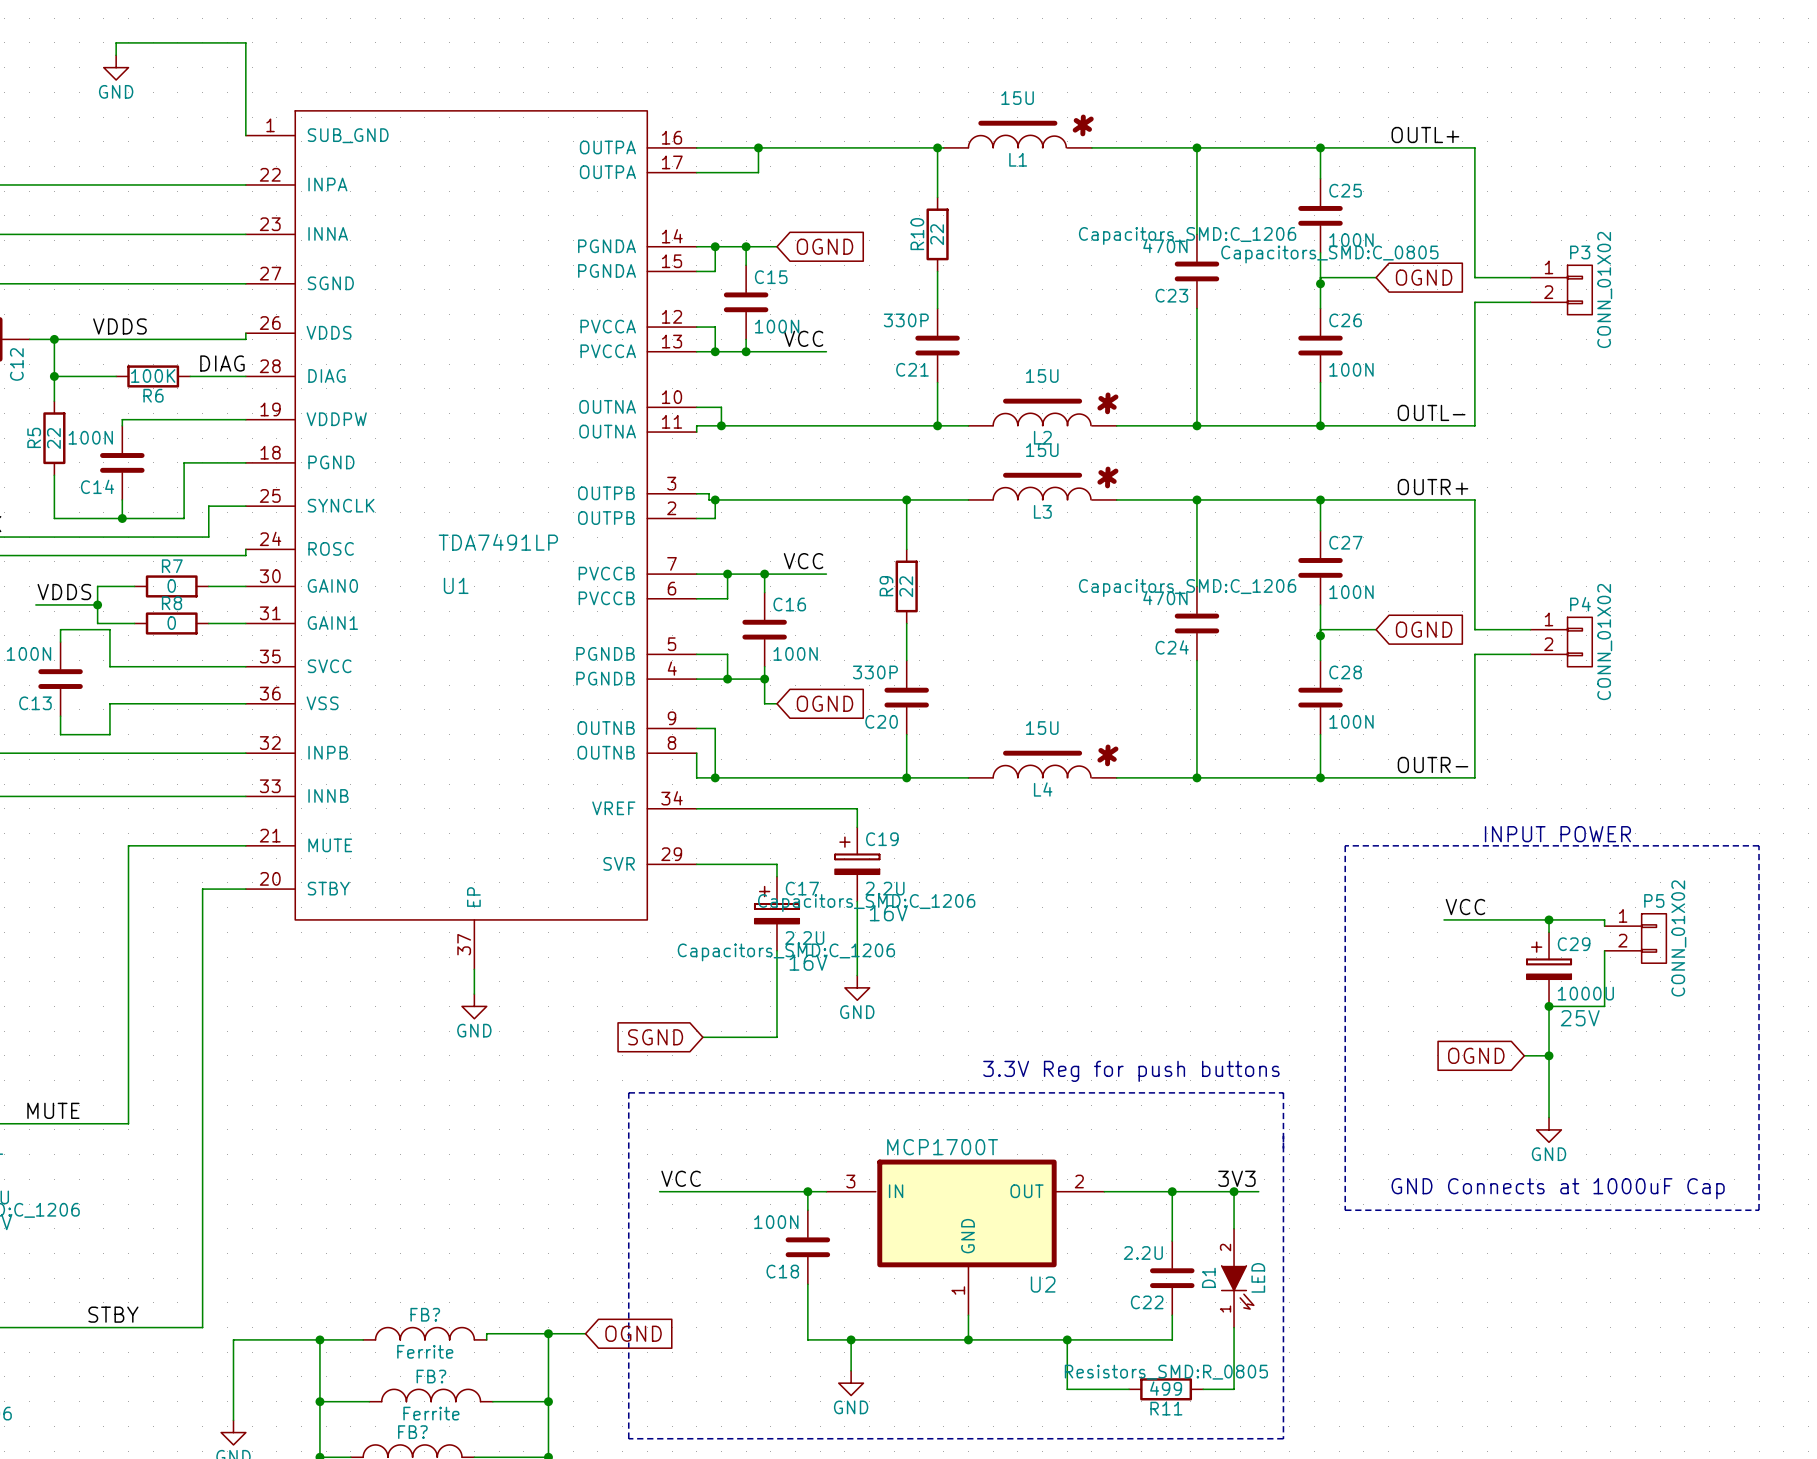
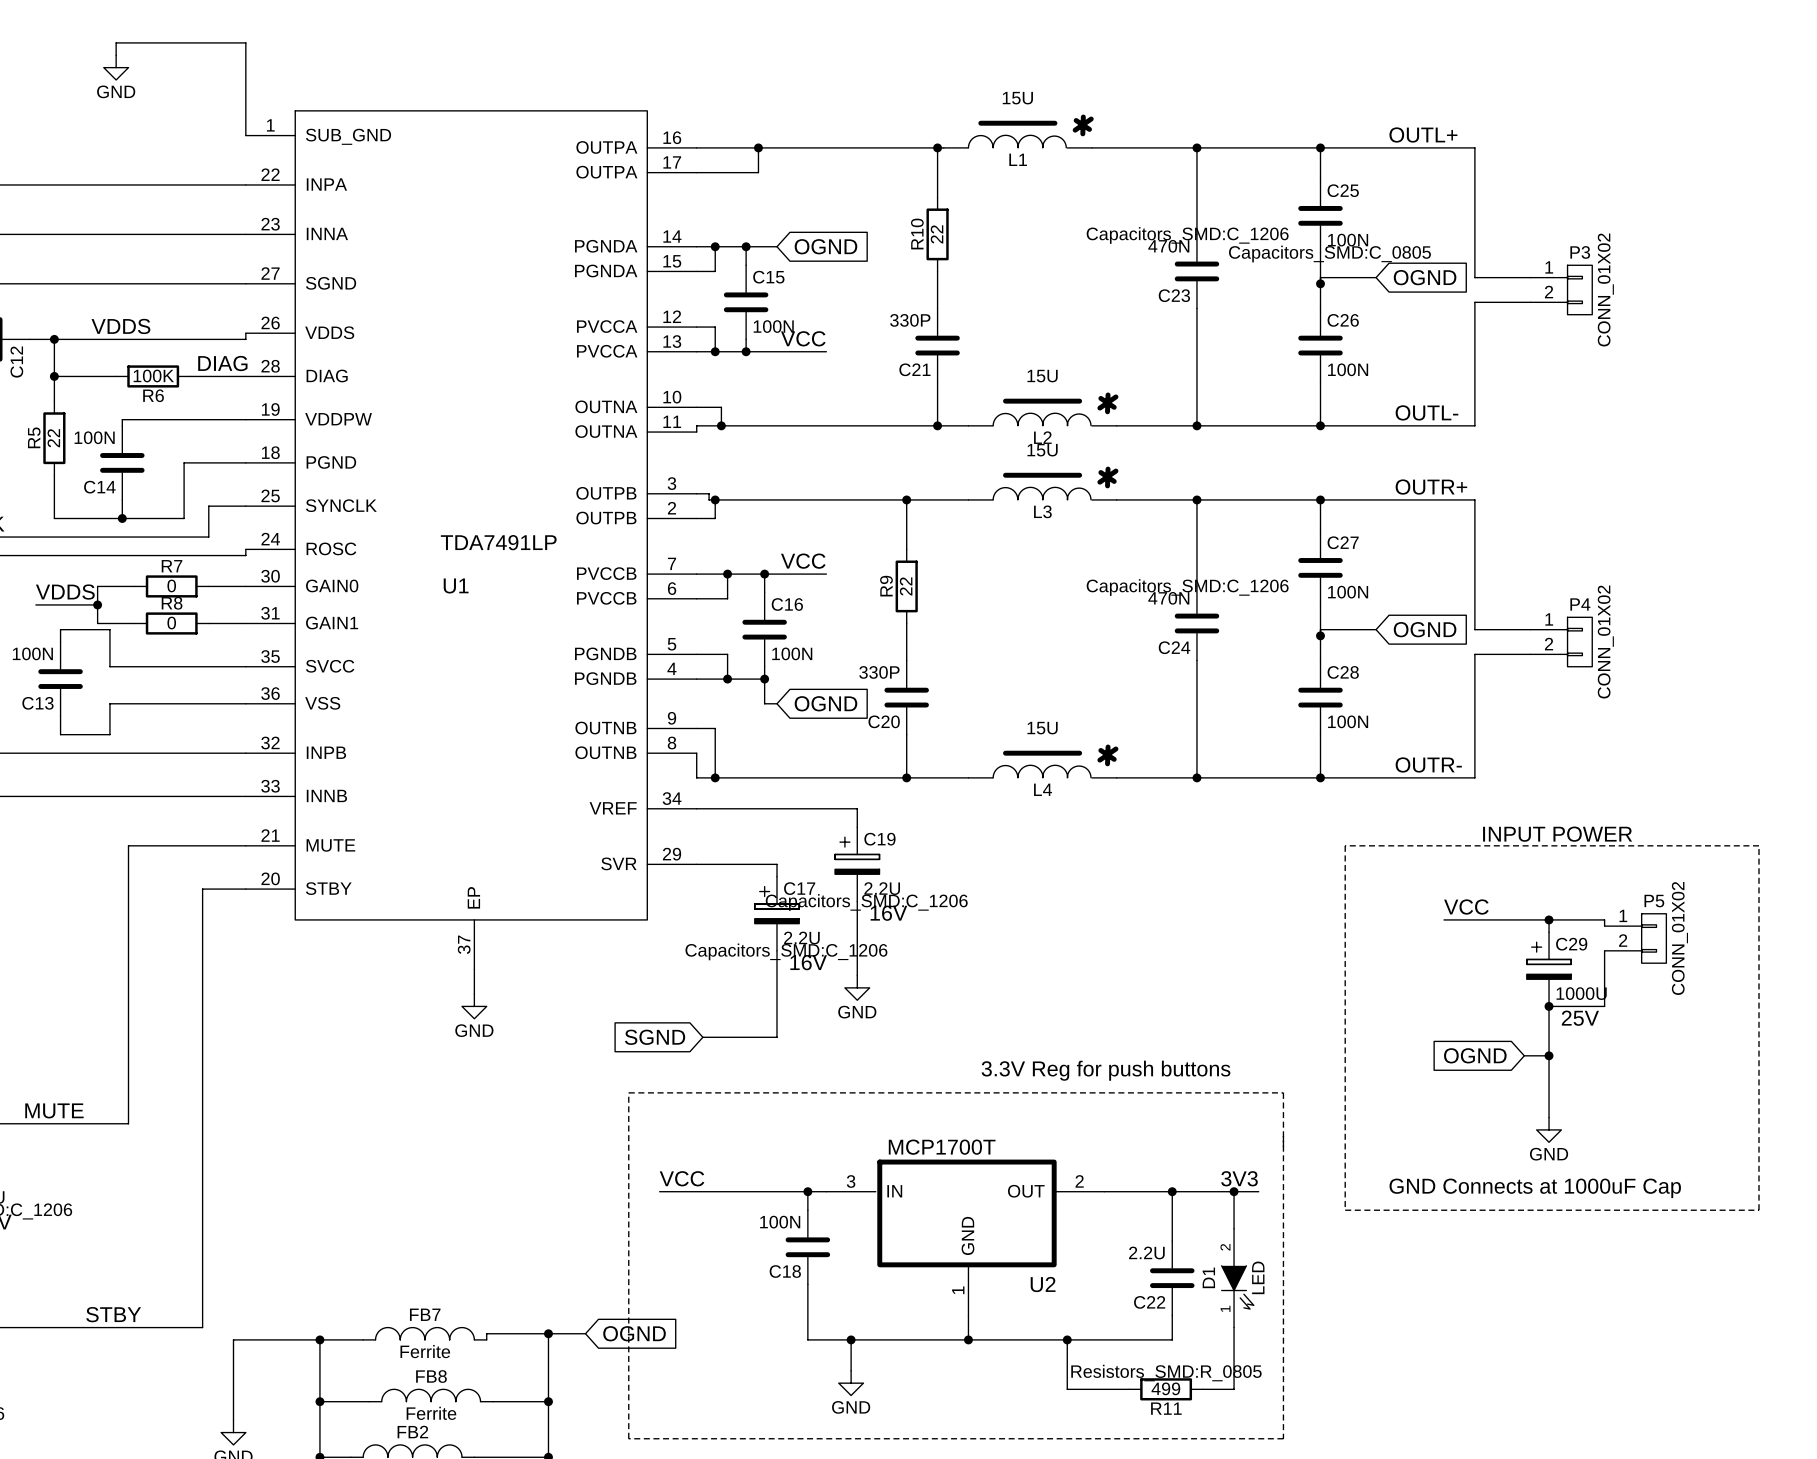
FB? name: FB? (425, 1314) -> FB7 (425, 1314)
FB? name: FB? (431, 1376) -> FB8 (431, 1376)
FB? name: FB? (412, 1432) -> FB2 (412, 1432)

